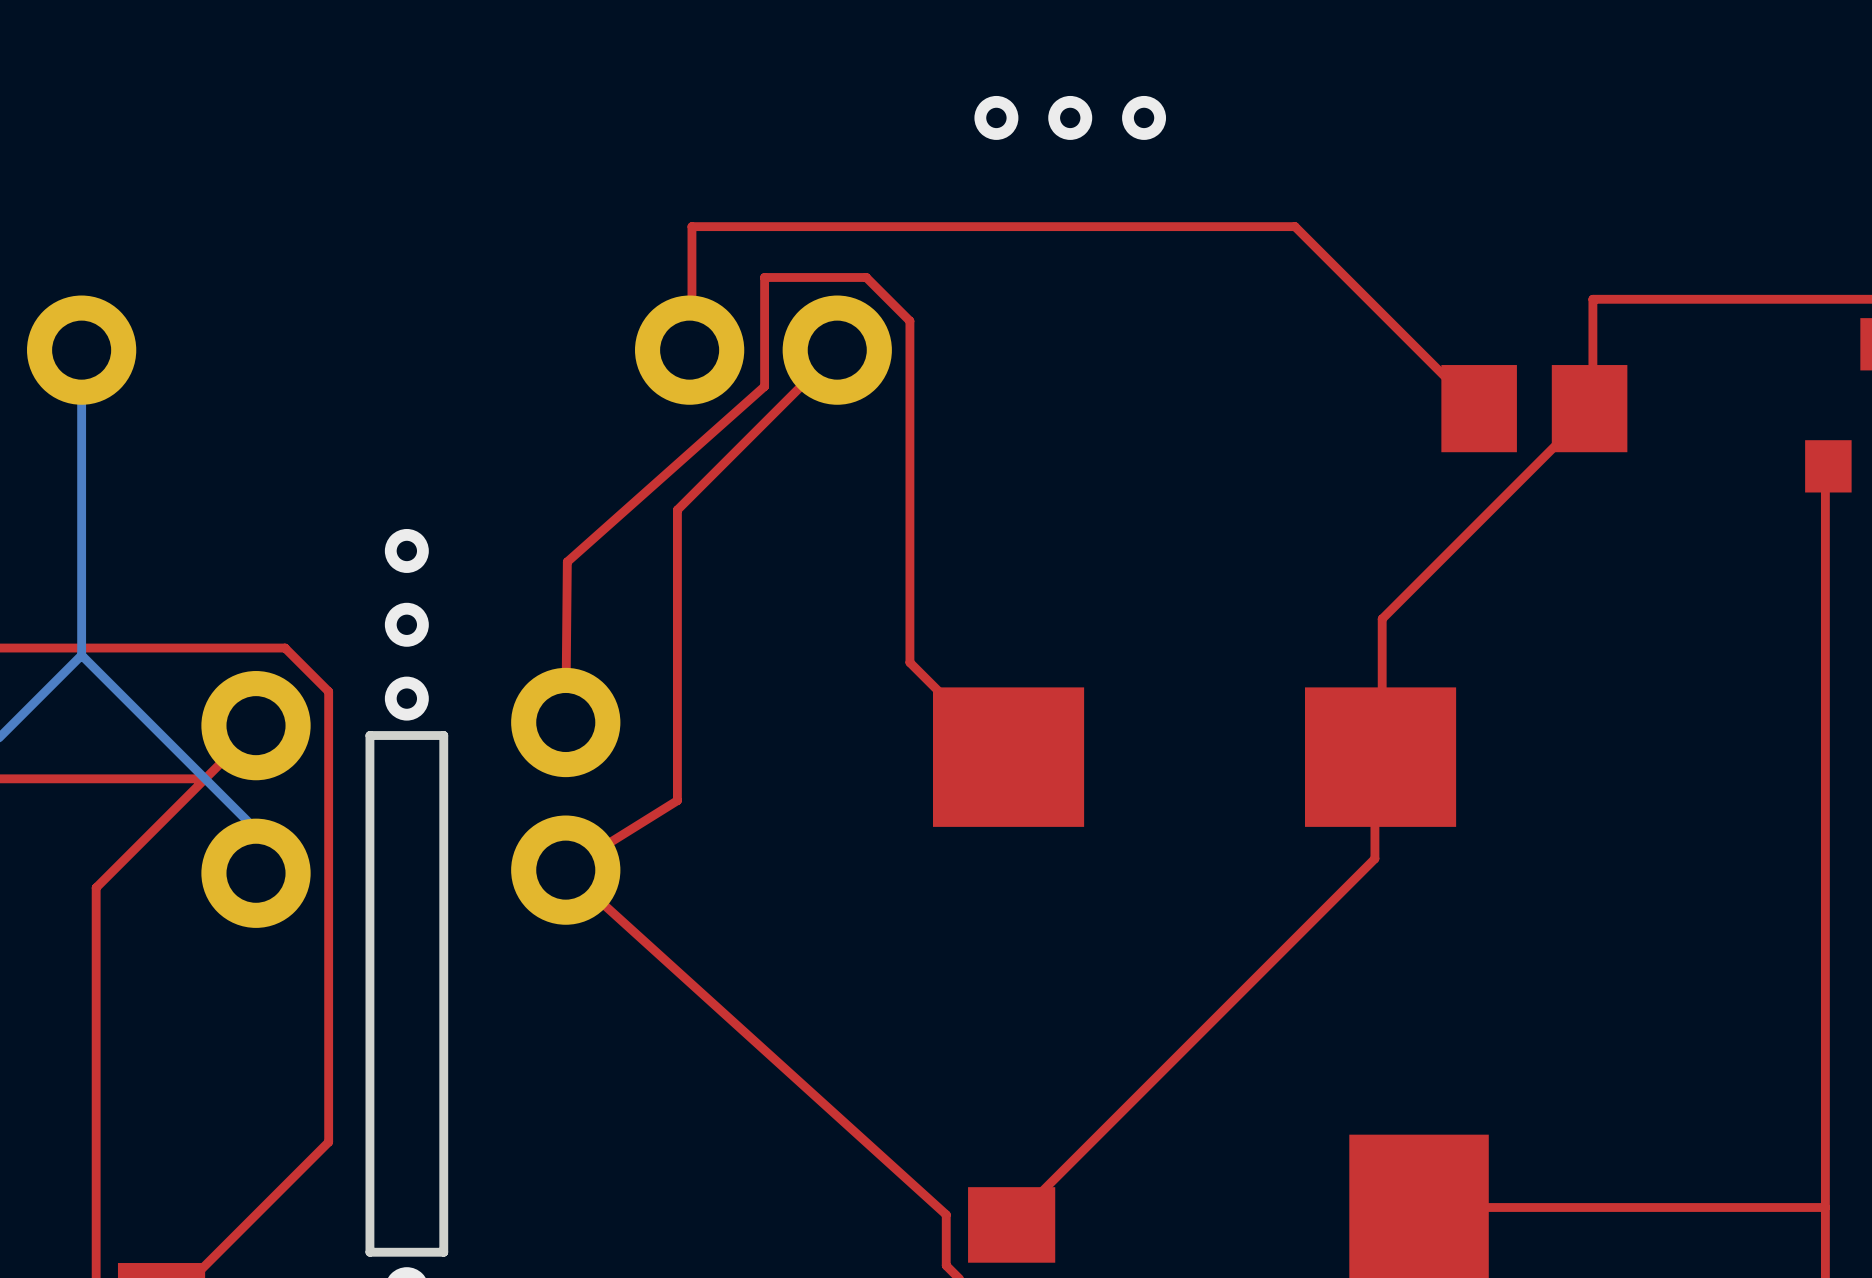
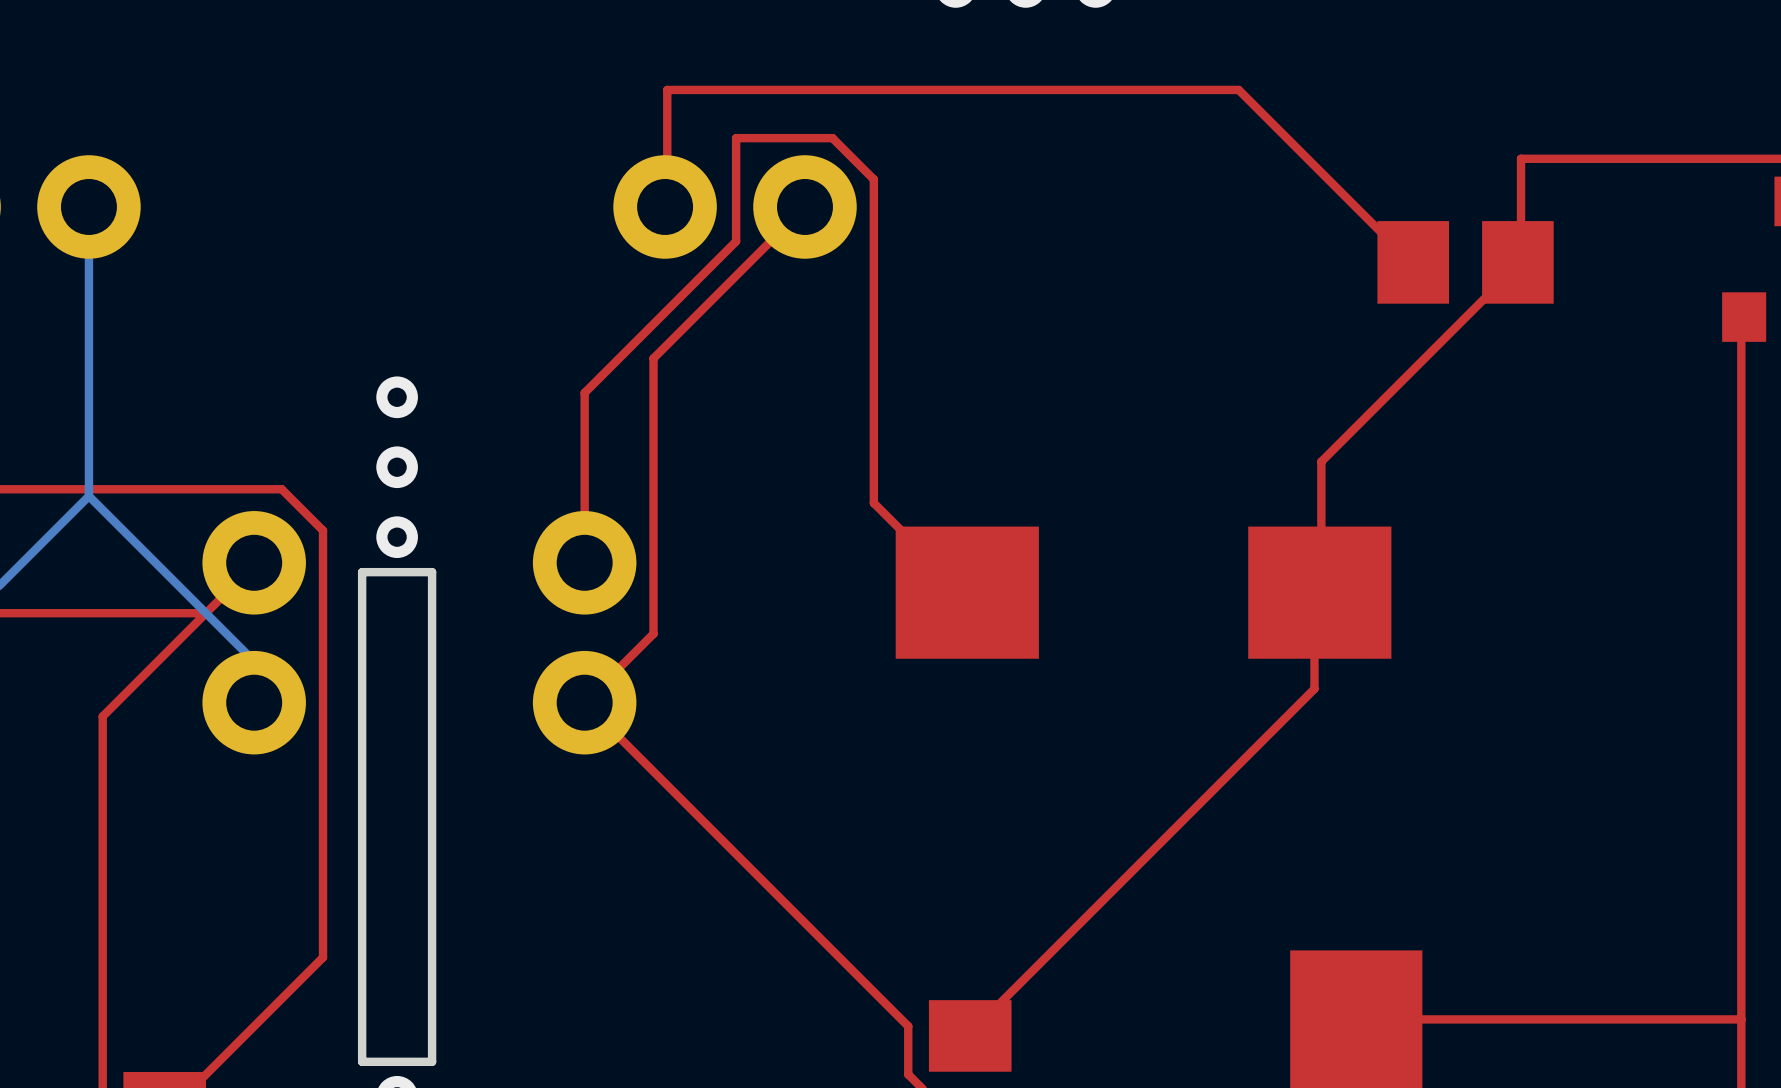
top track: (764, 386) (567, 561) (565, 722) -> (736, 241) (584, 392) (584, 562)
part position: (565, 796) -> (584, 632)
top track: (677, 800) (565, 870) (946, 1214) -> (653, 633) (584, 702) (908, 1026)

